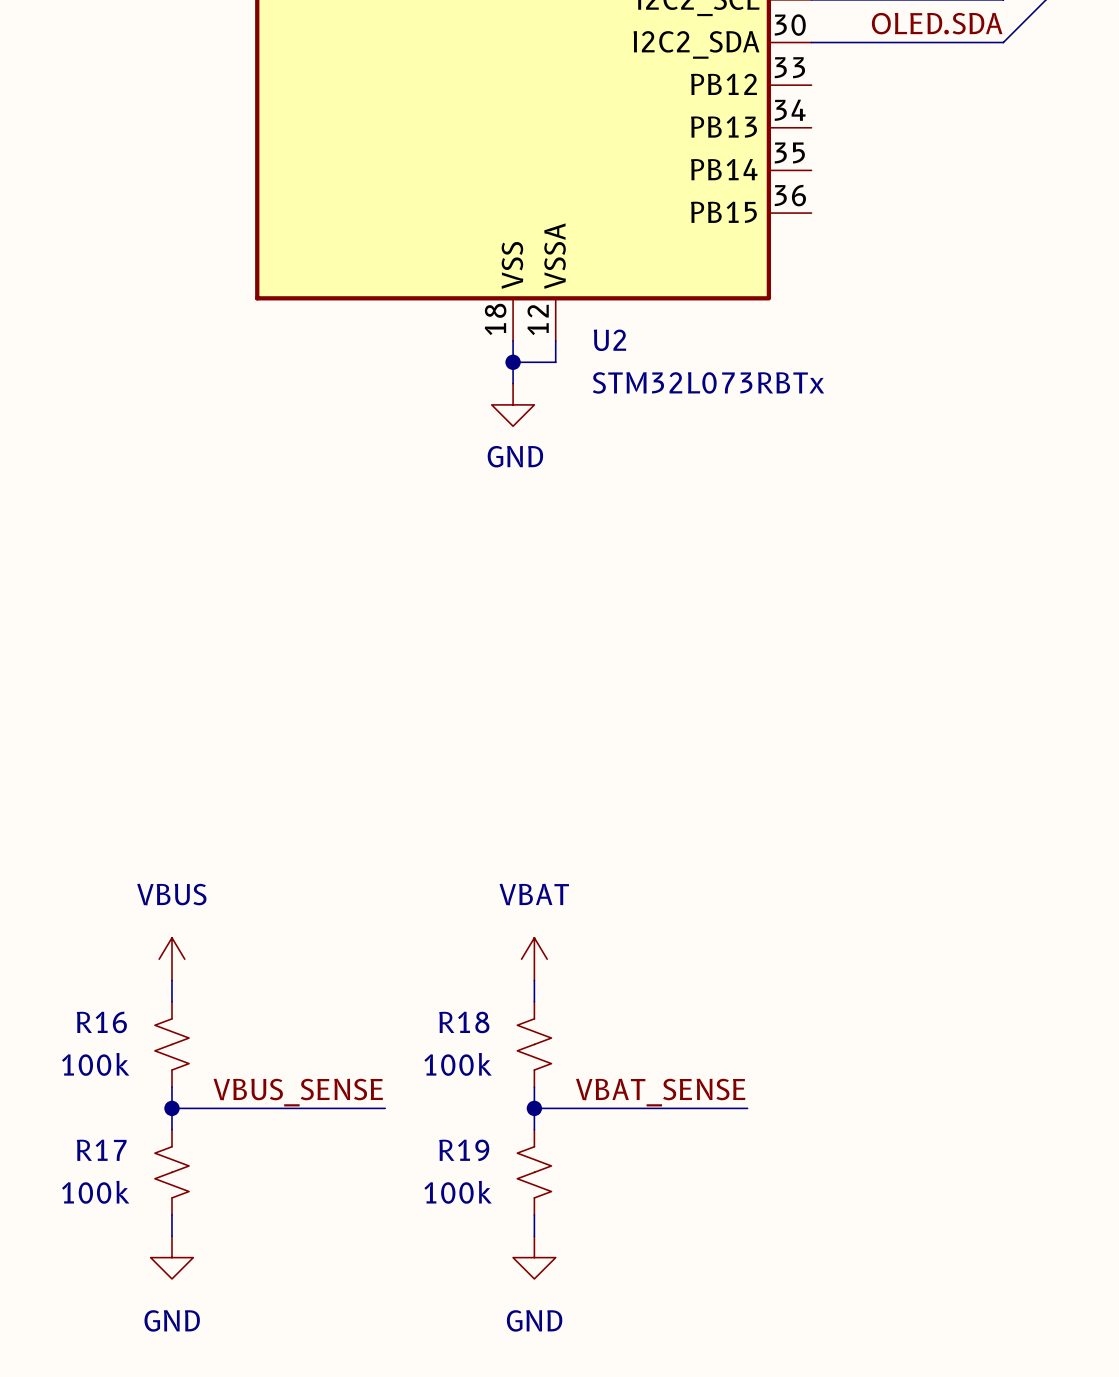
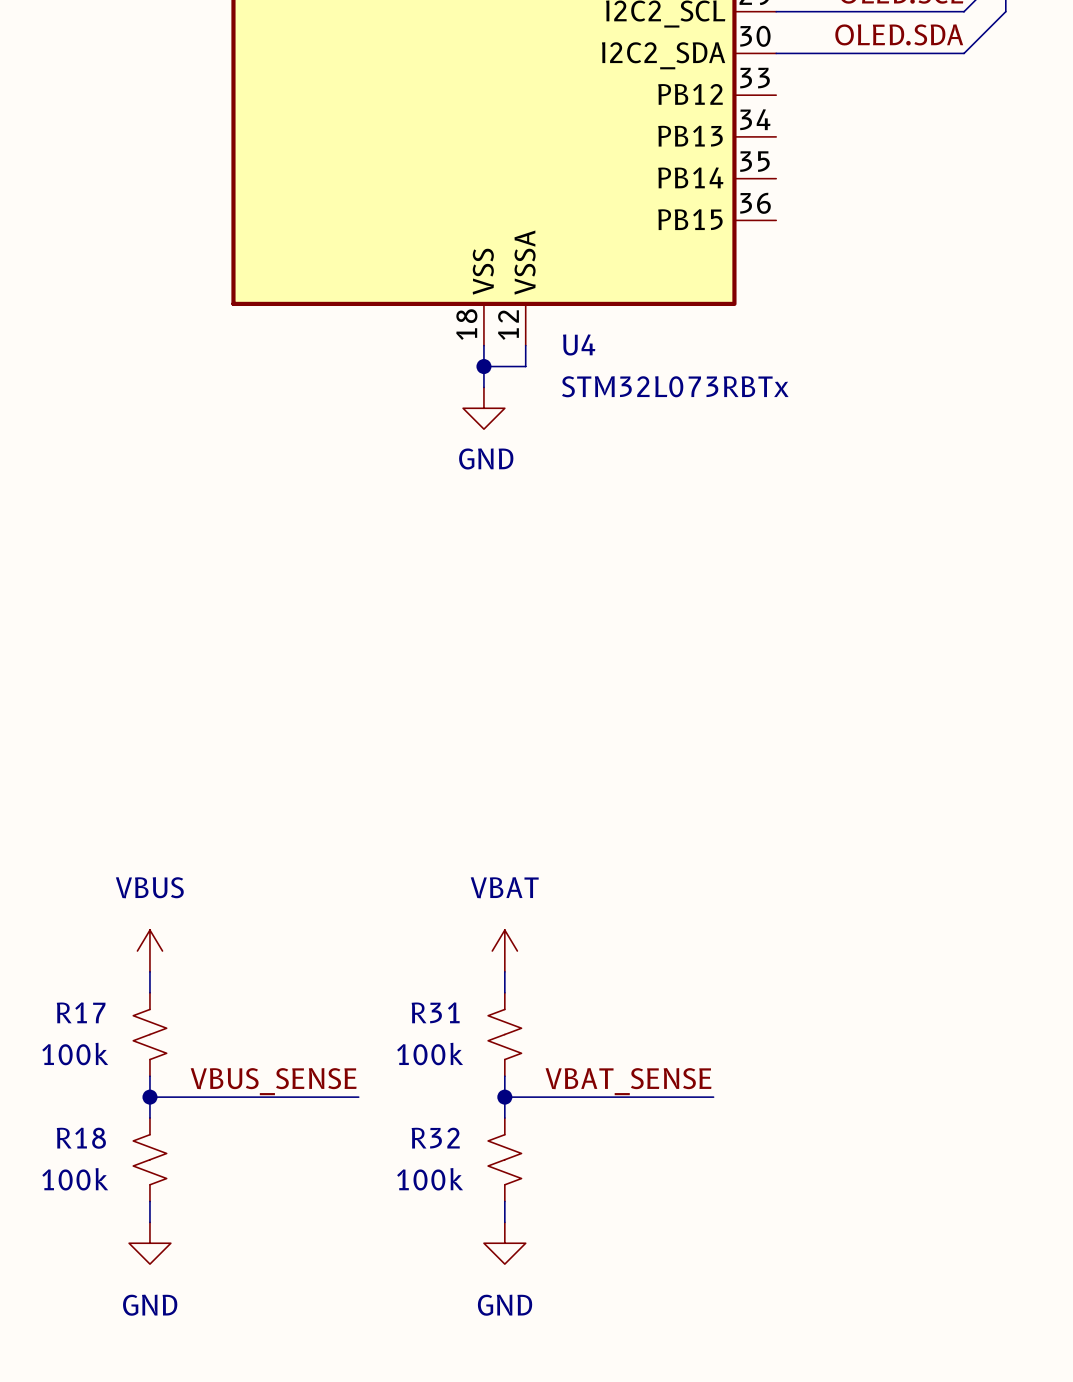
U2 name: U2 (609, 340) -> U4 (579, 344)
R16 name: R16 (101, 1022) -> R17 (81, 1012)
R18 name: R18 (464, 1022) -> R31 (435, 1012)
R17 name: R17 (101, 1150) -> R18 (81, 1138)
R19 name: R19 (464, 1150) -> R32 (435, 1138)

